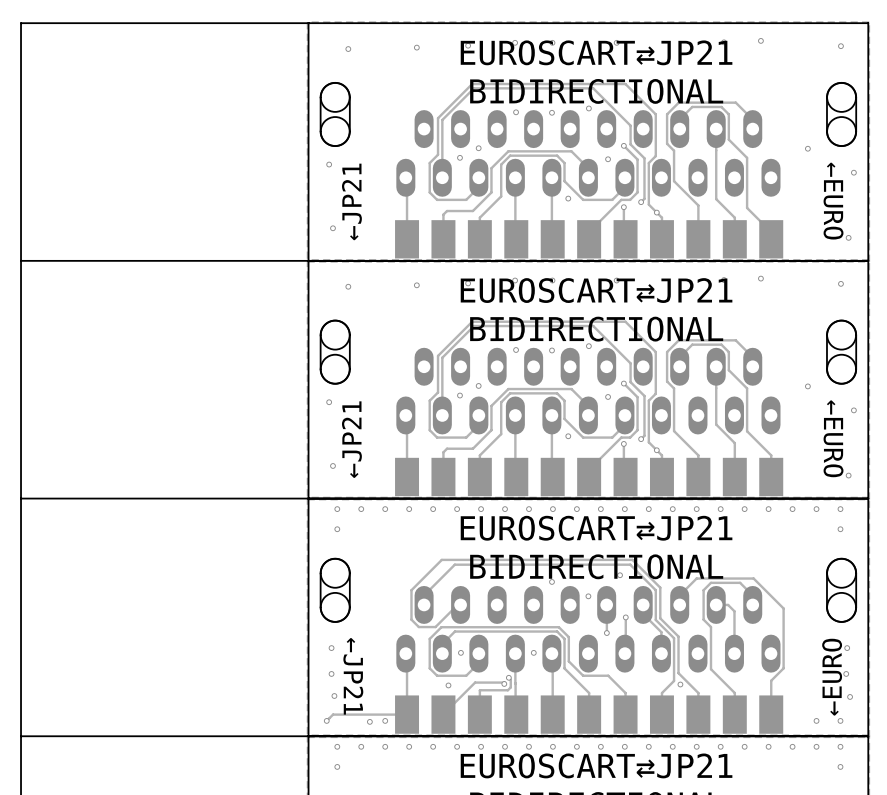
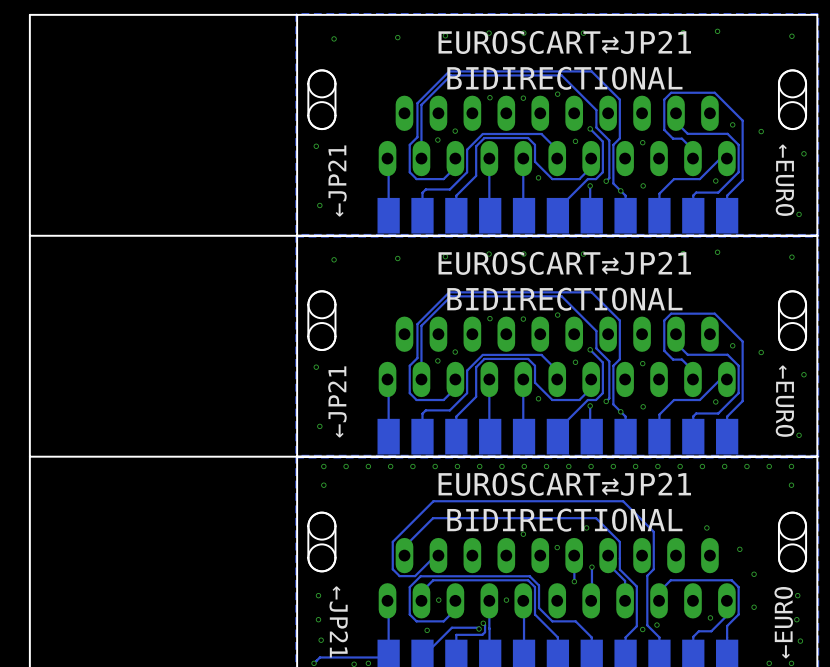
track: (711, 106) (692, 106) (679, 119) (679, 129) -> (671, 92) (664, 99) (664, 129) (673, 138) (681, 138) (692, 149) (692, 158)
track: (721, 106) (728, 114) (728, 139) (747, 157) (747, 207) (771, 232) -> (680, 92) (714, 92) (742, 120) (742, 180) (727, 195) (727, 209)
track: (752, 129) (752, 119) (735, 102) (678, 102) (667, 114) (667, 143) (674, 150) (674, 181) (698, 205) (698, 215) -> (726, 158) (720, 158) (699, 179) (674, 179) (659, 193)
track: (716, 138) (716, 199) (734, 217) -> (676, 122) (687, 133) (727, 133) (738, 144) (738, 172) (718, 192) (696, 192) (693, 195)
via: none -> (732, 124)
via: none -> (642, 142)
via: none -> (715, 181)
via: none -> (643, 185)
track: (711, 344) (692, 344) (679, 357) (679, 366) -> (671, 313) (664, 320) (664, 350) (673, 359) (681, 359) (692, 370) (692, 379)
track: (721, 344) (728, 352) (728, 370) (747, 388) (747, 431) (771, 455) -> (680, 313) (714, 313) (742, 341) (742, 401) (727, 416)
track: (752, 366) (752, 357) (735, 340) (678, 340) (667, 352) (667, 381) (674, 388) (674, 431) (698, 455) -> (726, 379) (720, 379) (699, 400) (674, 400) (659, 416)
track: (716, 376) (716, 424) (734, 443) (734, 455) -> (676, 343) (687, 354) (727, 354) (738, 365) (738, 393) (718, 413) (696, 413) (693, 416)
via: none -> (732, 345)
via: none -> (642, 363)
via: none -> (715, 401)
via: none -> (643, 406)
track: (441, 559) (632, 559) (660, 587) (660, 618) (678, 636) (678, 673) (685, 679) -> (420, 513) (433, 501) (623, 501) (653, 531) (653, 569) (647, 575) (647, 625)
via: none -> (706, 527)
via: none -> (739, 549)
track: (679, 604) (679, 595) (696, 578) (753, 578) (783, 608) (783, 638) -> (659, 600) (659, 592) (670, 580) (731, 580) (738, 587)
track: (716, 604) (728, 604) (734, 611) (734, 653) -> none
track: (752, 604) (752, 595) (740, 582) (711, 582) (703, 590) (703, 619) (711, 627) (711, 669) (734, 693) -> (726, 600) (726, 615) (711, 631) (698, 631) (693, 637)
via: none -> (754, 574)
via: none -> (754, 607)
via: none -> (710, 617)
via: none -> (656, 625)

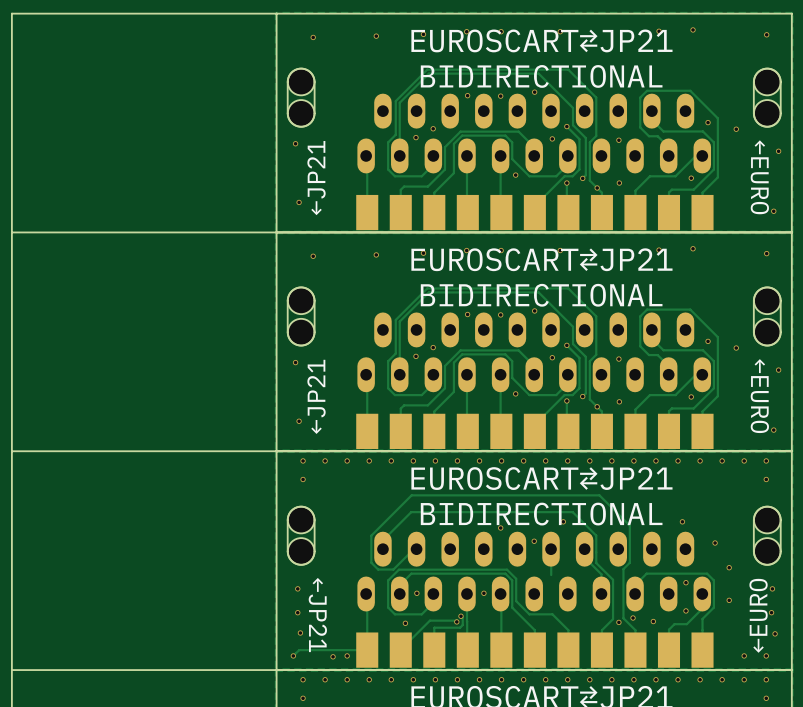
track: (591, 567) (591, 600) -> none
via: (591, 567) -> none
via: (574, 581) -> none
via: none -> (685, 582)
via: none -> (653, 621)

